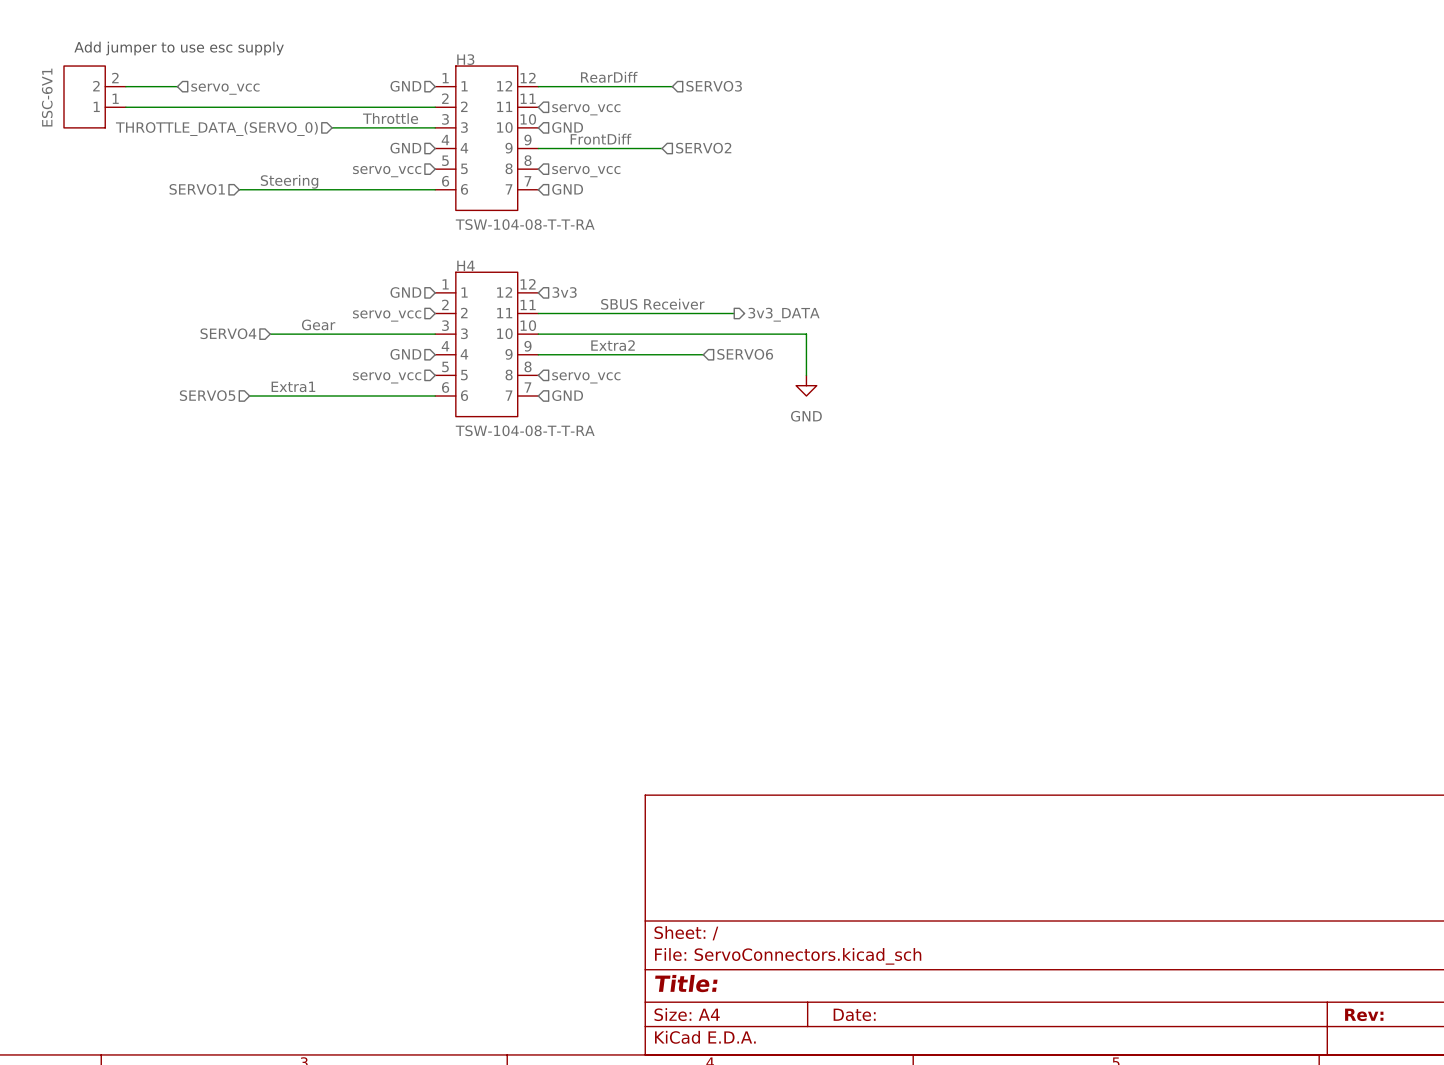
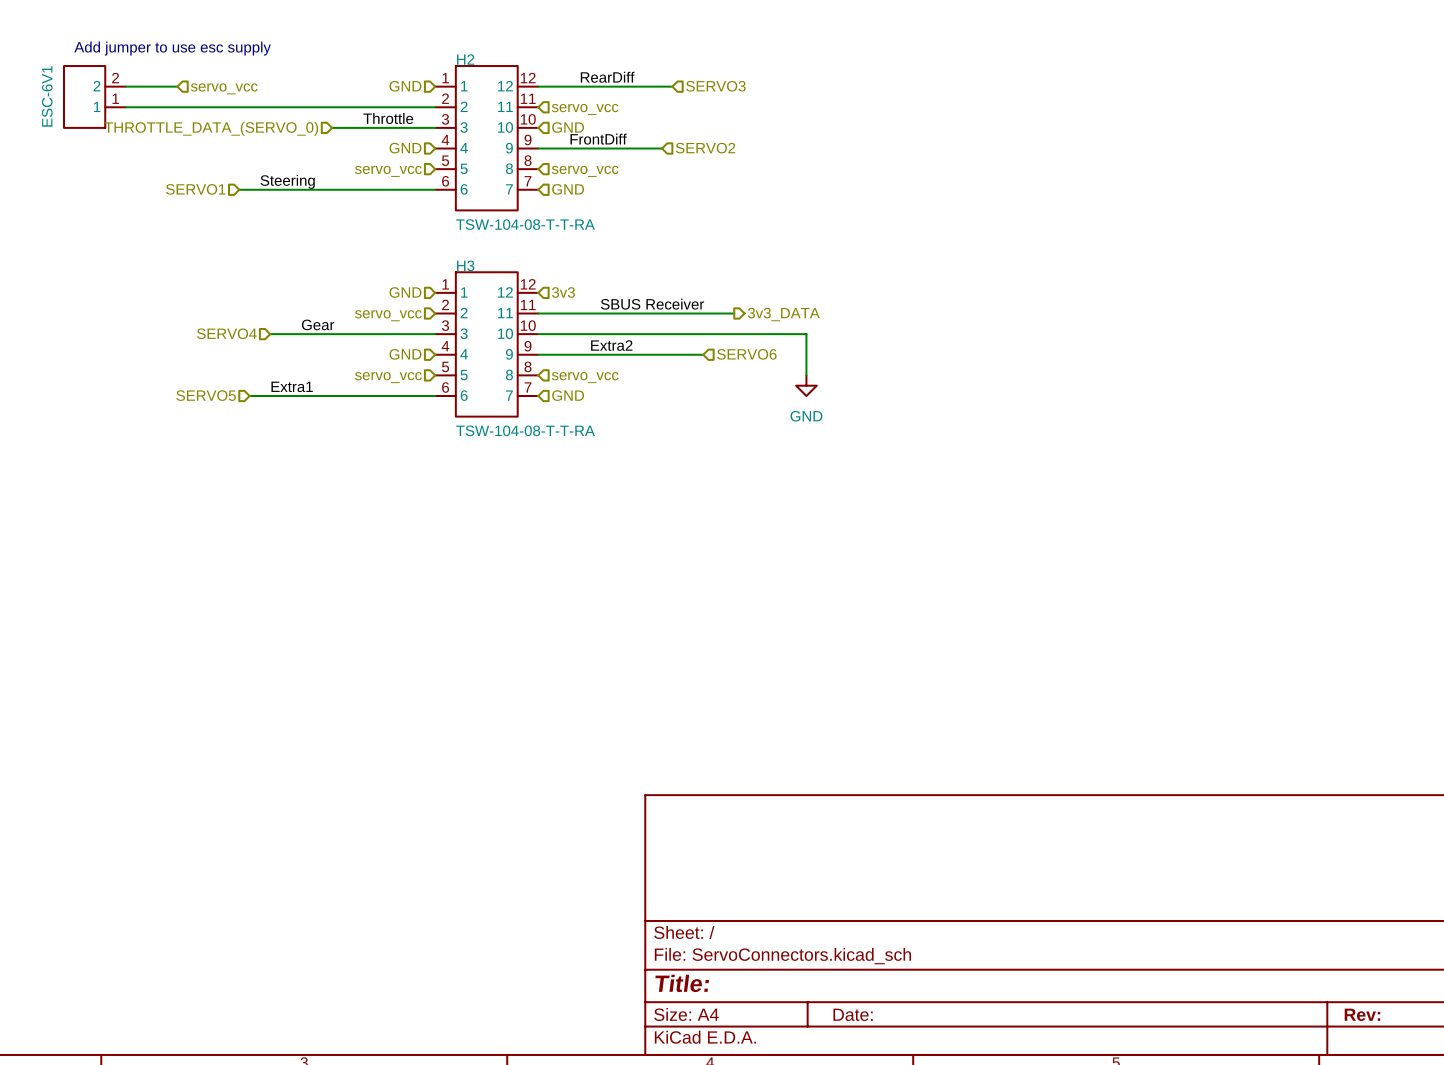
H3 name: H3 (465, 59) -> H2 (465, 59)
H4 name: H4 (465, 265) -> H3 (465, 265)

